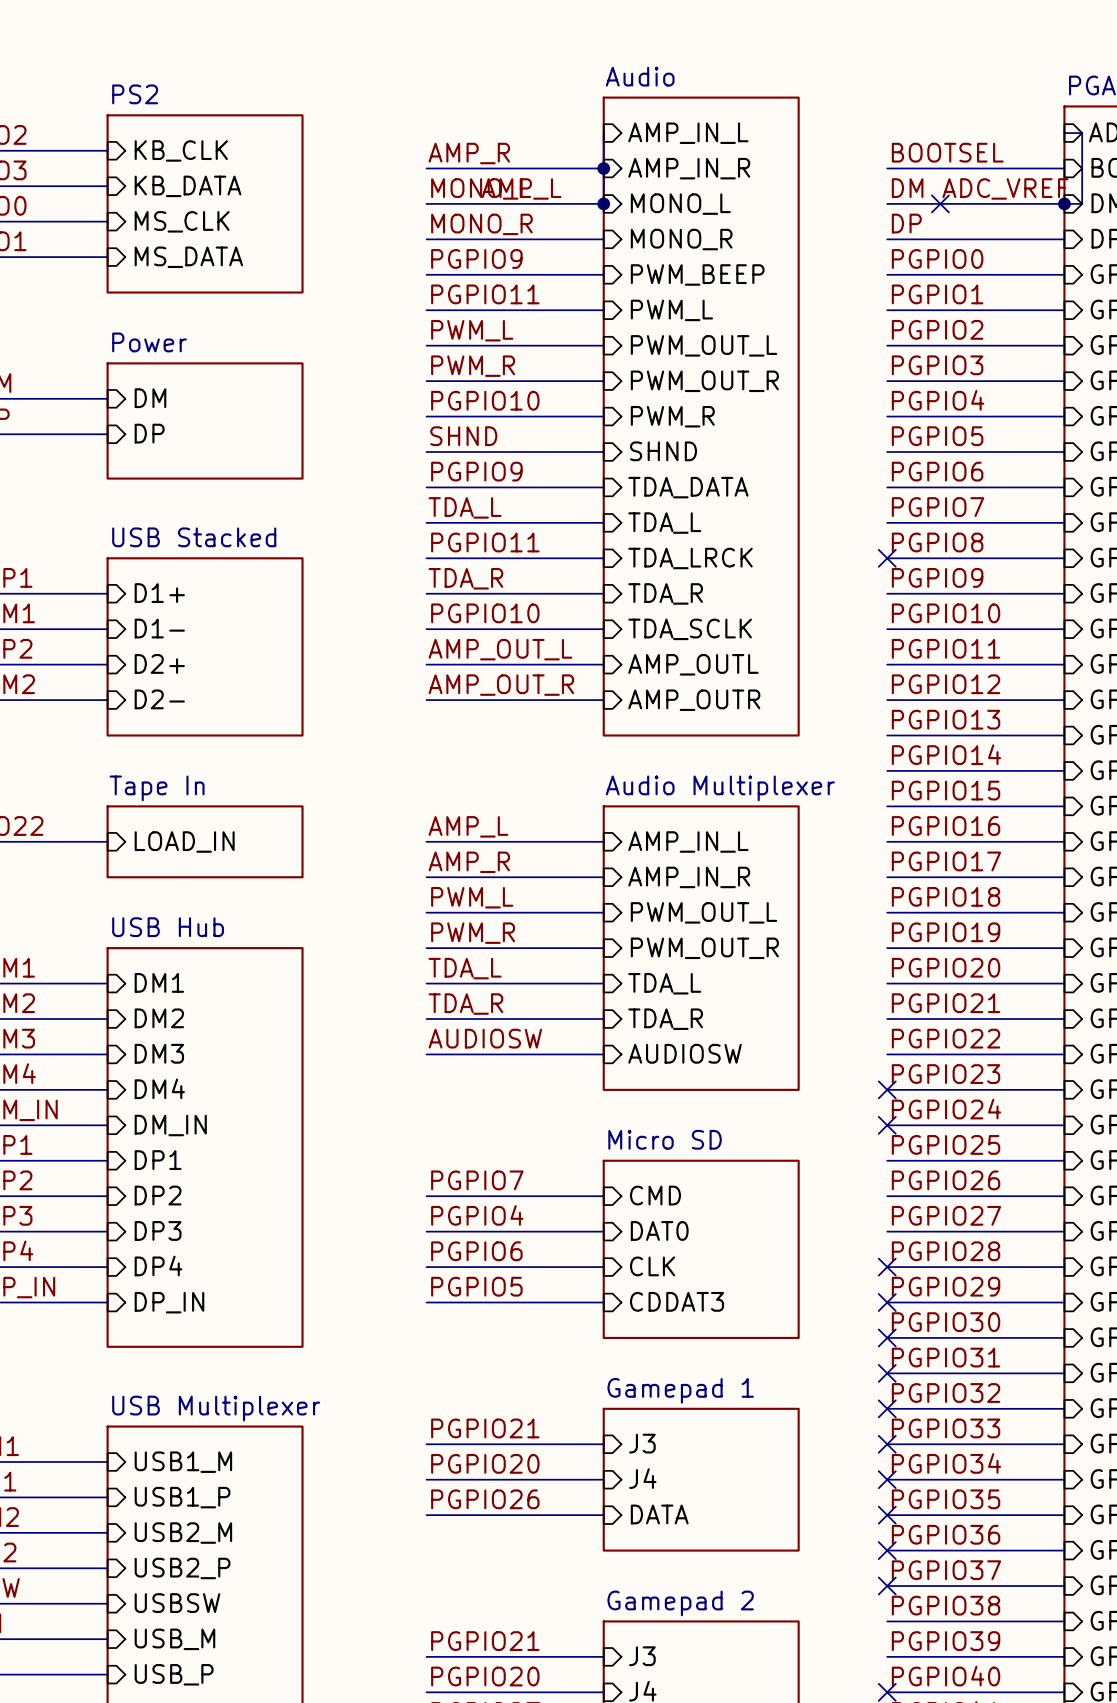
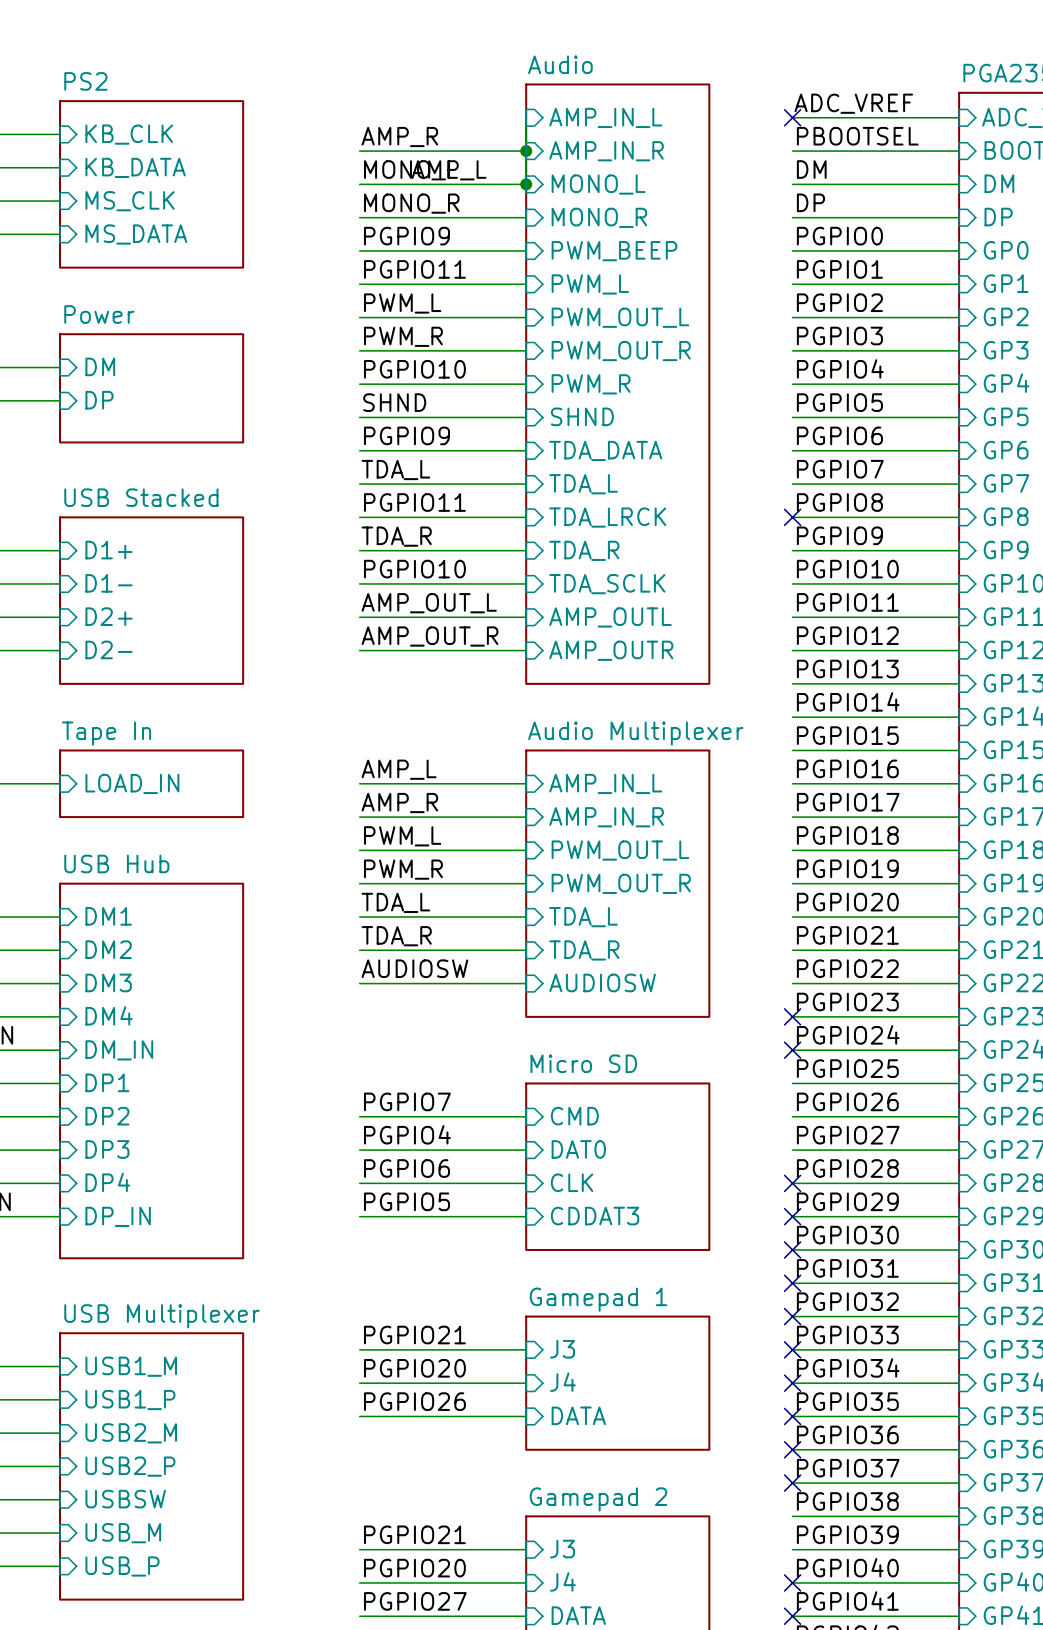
no-connect mark: none -> (792, 117)
wire: (1064, 133) (1082, 133) (1082, 203) (1064, 203) -> (959, 117) (792, 117)
label: BOOTSEL (947, 152) -> PBOOTSEL (857, 136)
label position: ADC_VREF (1005, 188) -> ADC_VREF (853, 103)
no-connect mark: (940, 203) -> none
junction: (1064, 203) -> none

